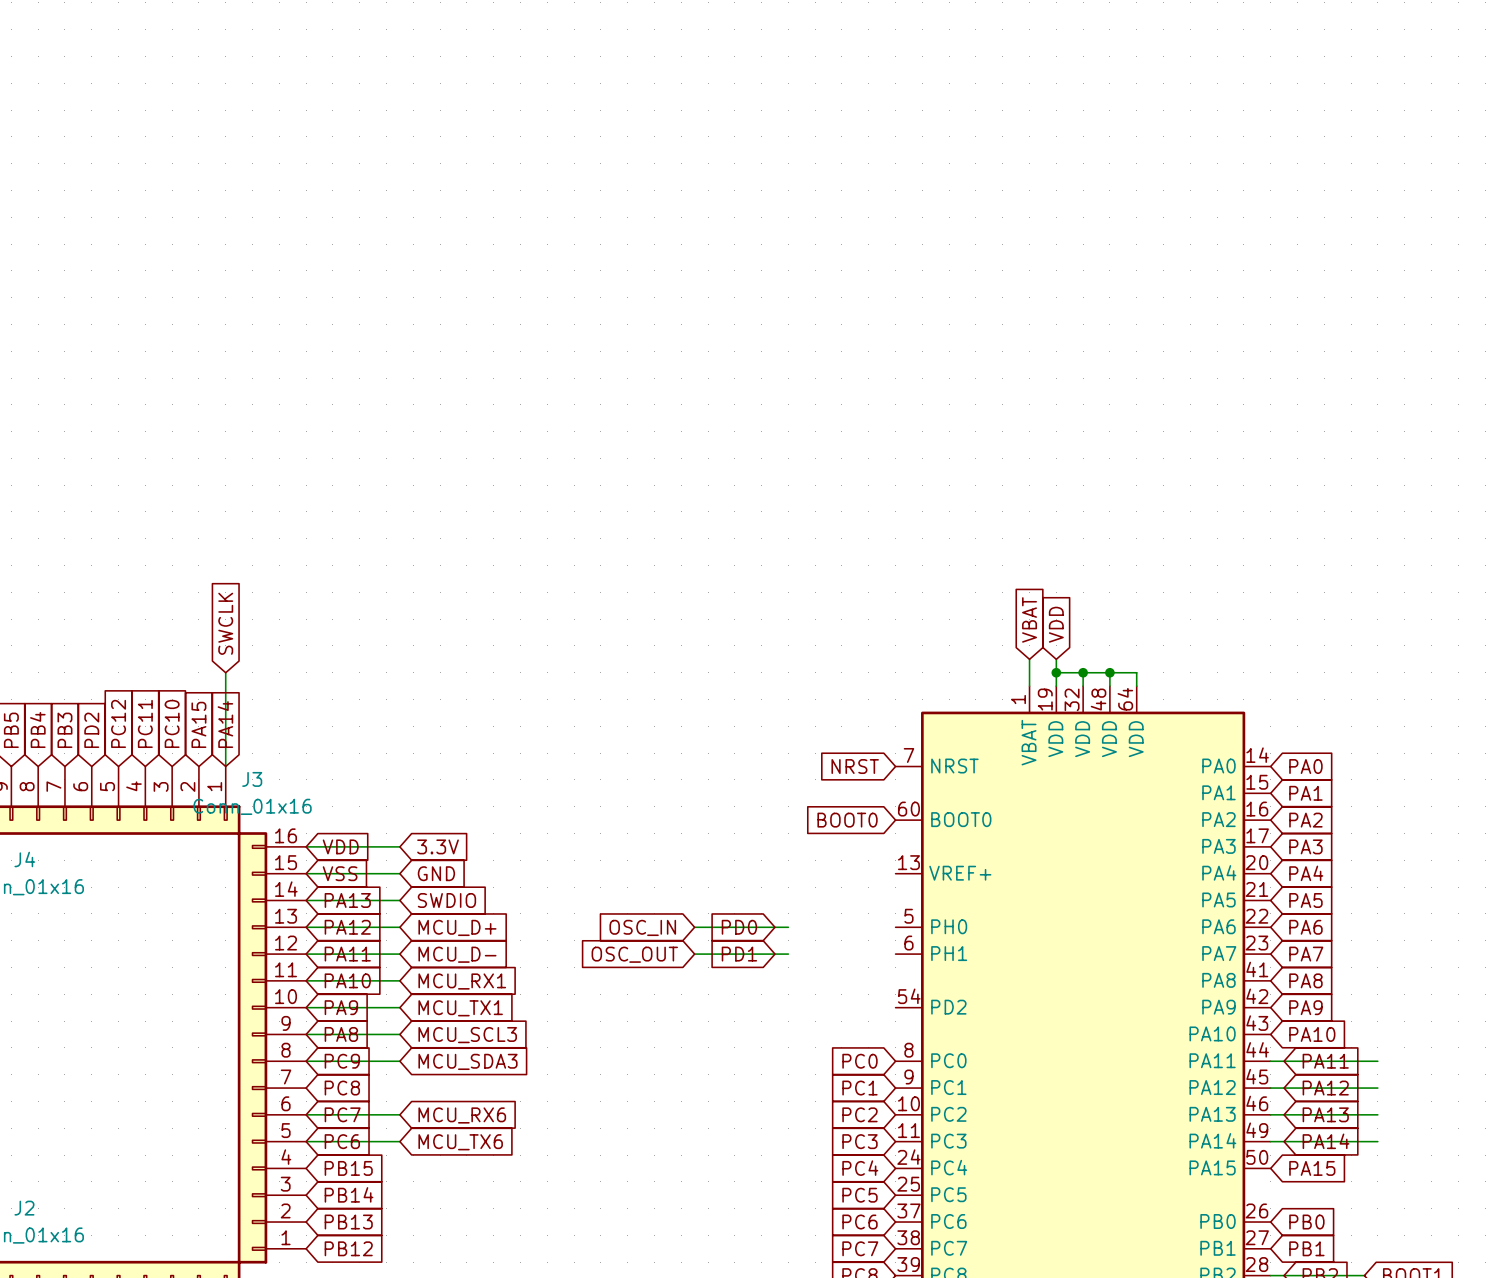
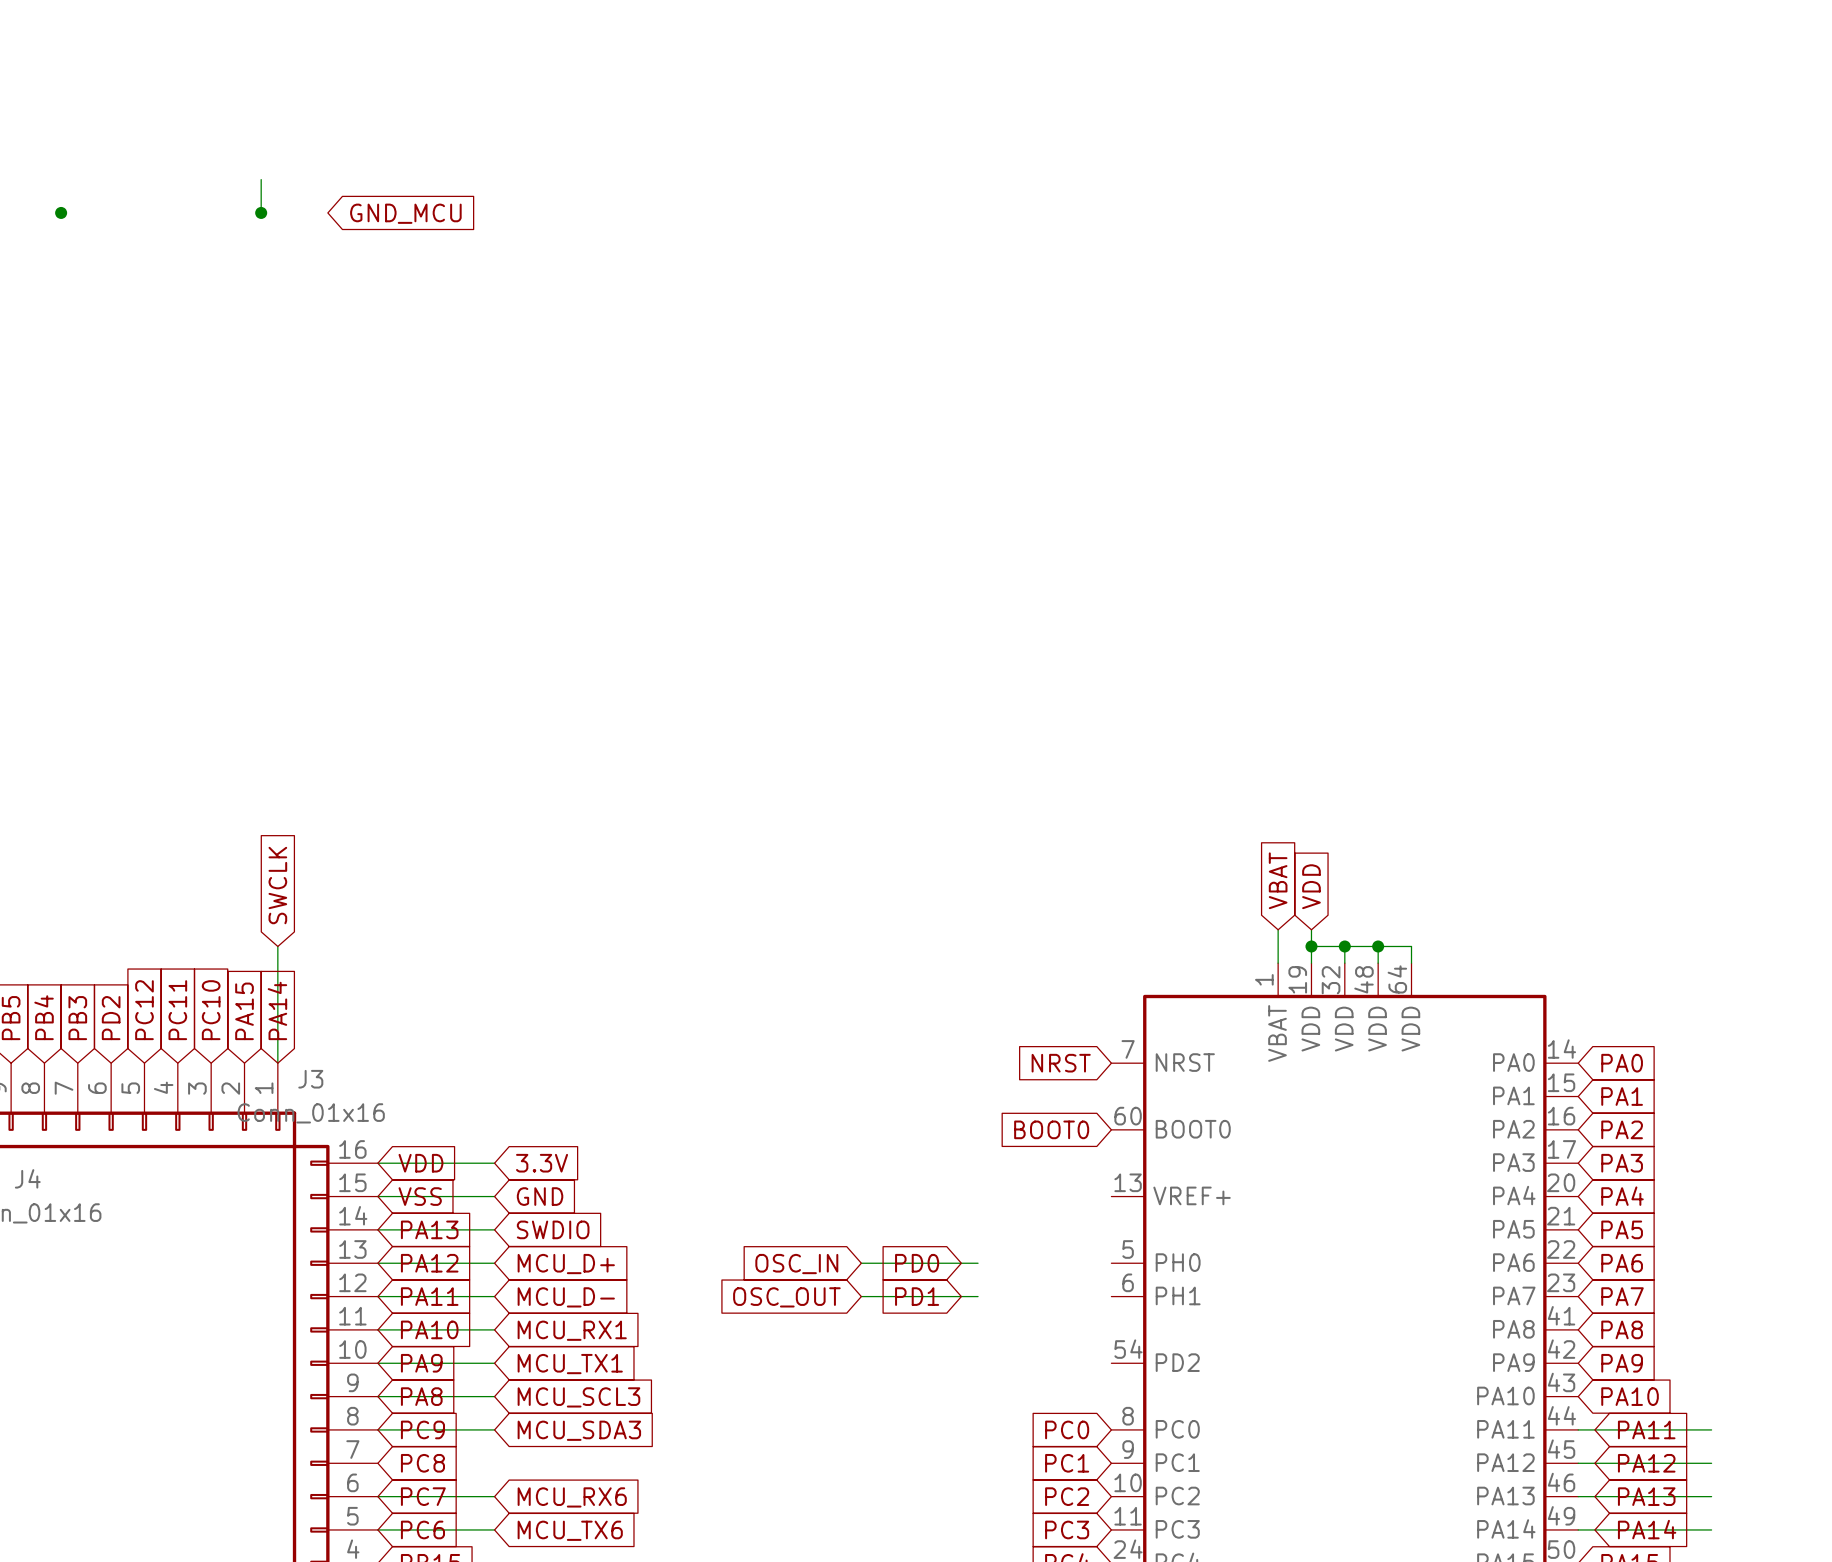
wire: none -> (261, 179) (261, 212)
junction: none -> (61, 212)
junction: none -> (261, 212)
global label: none -> GND_MCU (405, 213)

